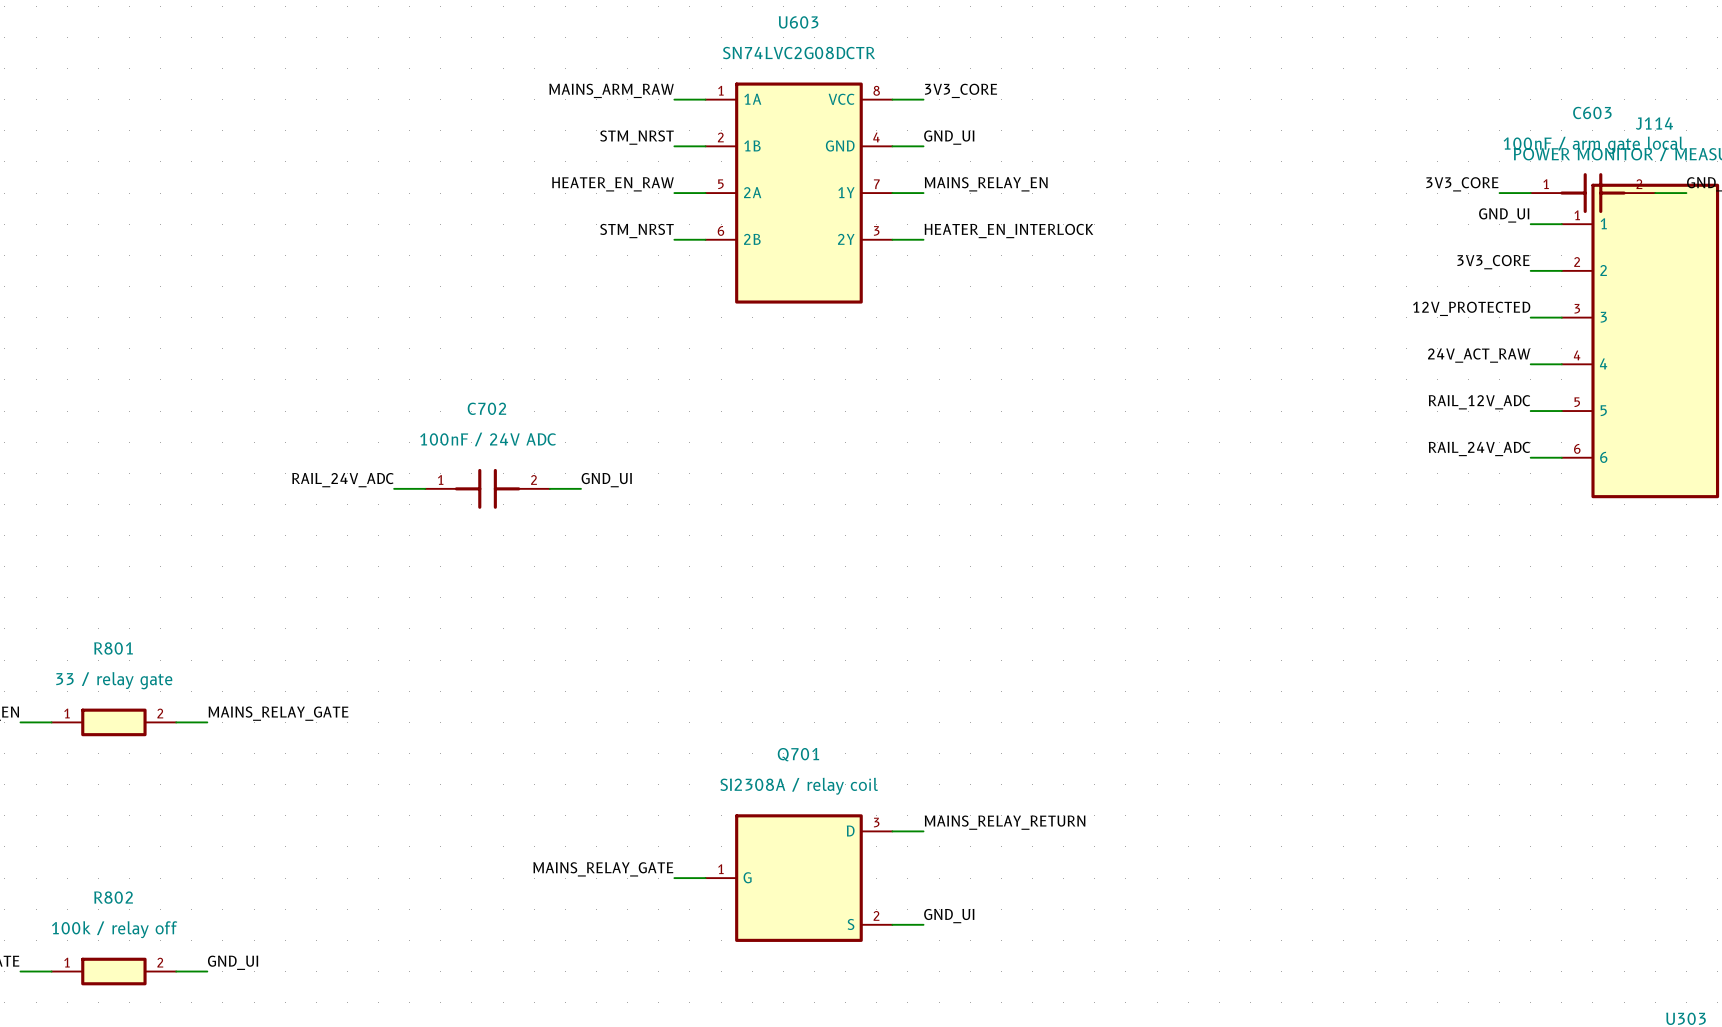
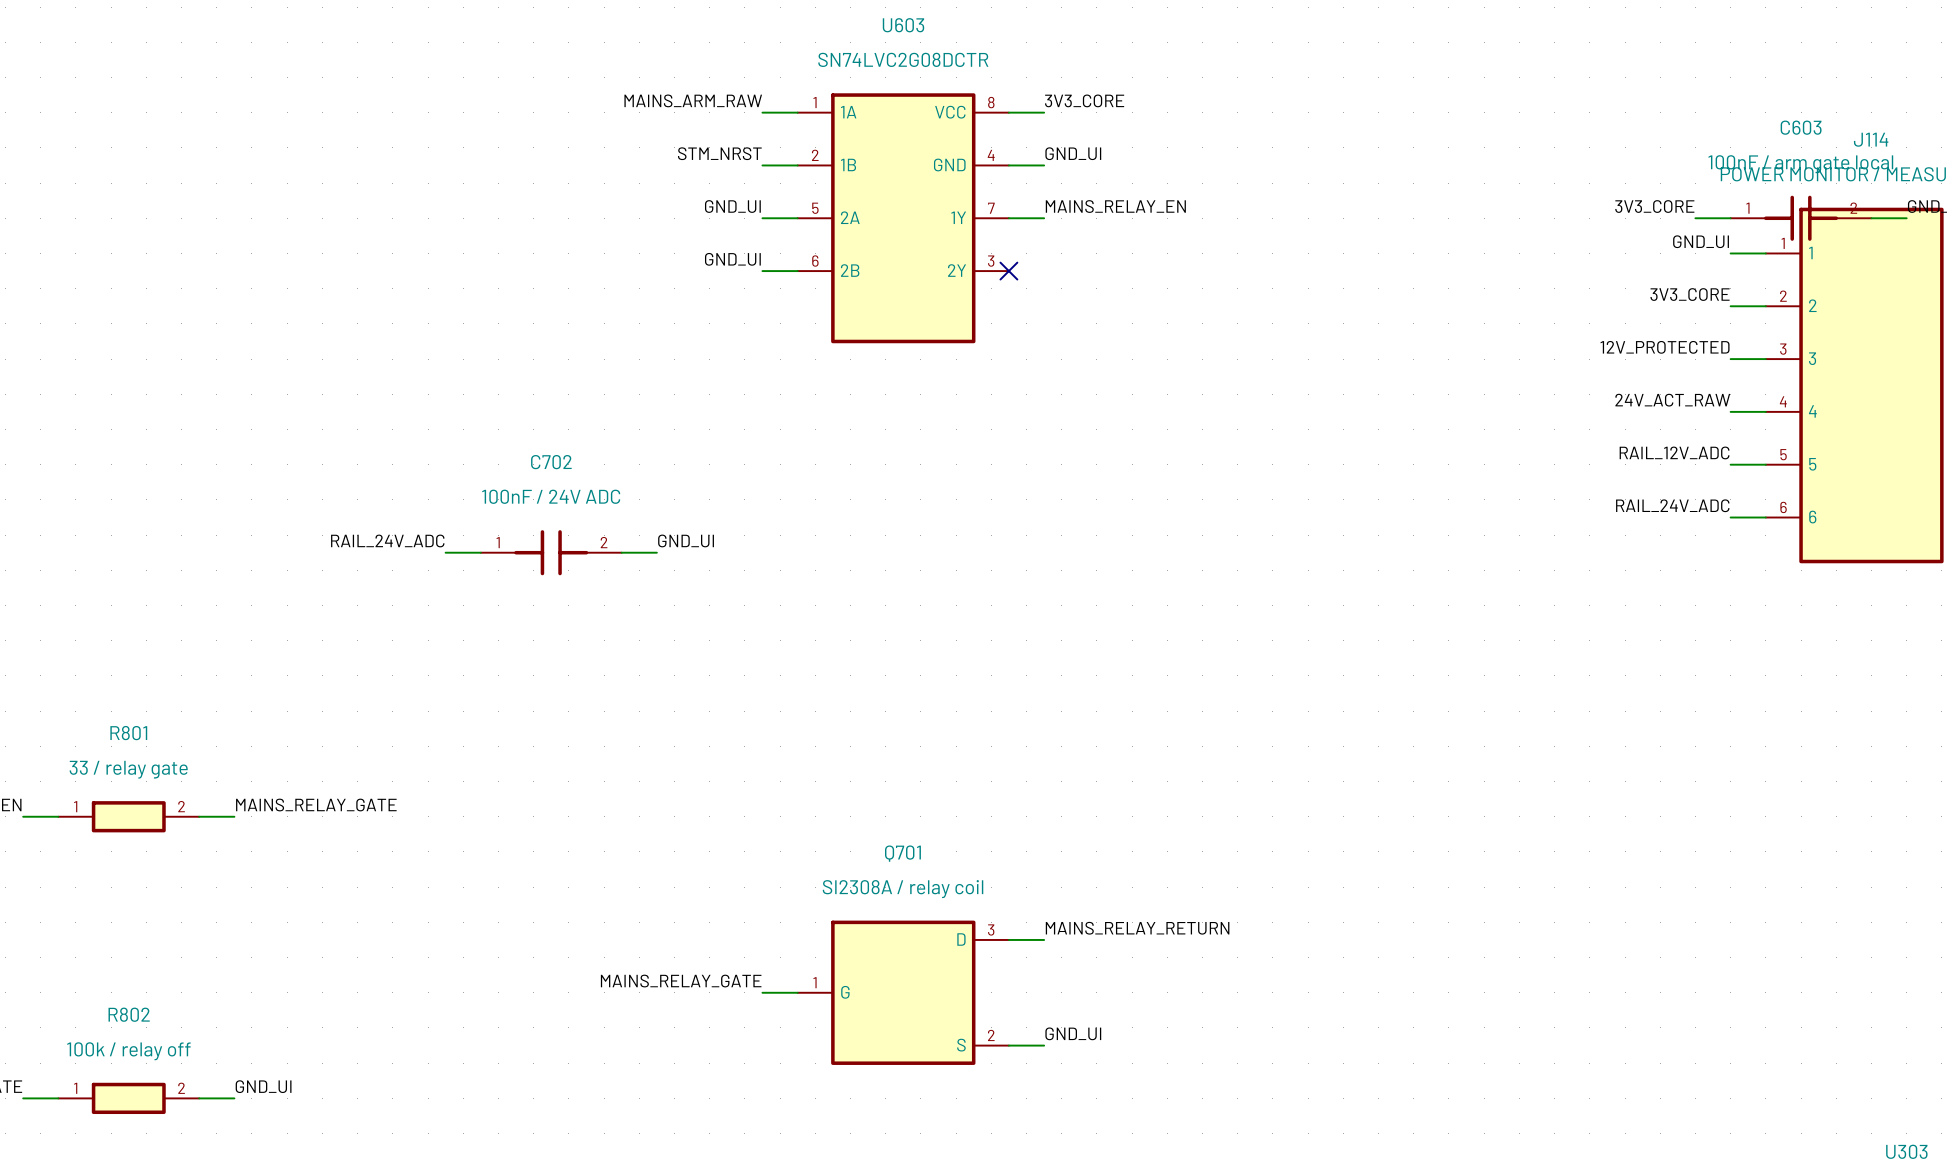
label: HEATER_EN_RAW (612, 184) -> GND_UI (732, 206)
label: STM_NRST (637, 231) -> GND_UI (732, 259)
label: HEATER_EN_INTERLOCK (1008, 231) -> none
wire: (892, 239) (923, 239) -> none
no-connect mark: none -> (1008, 271)

